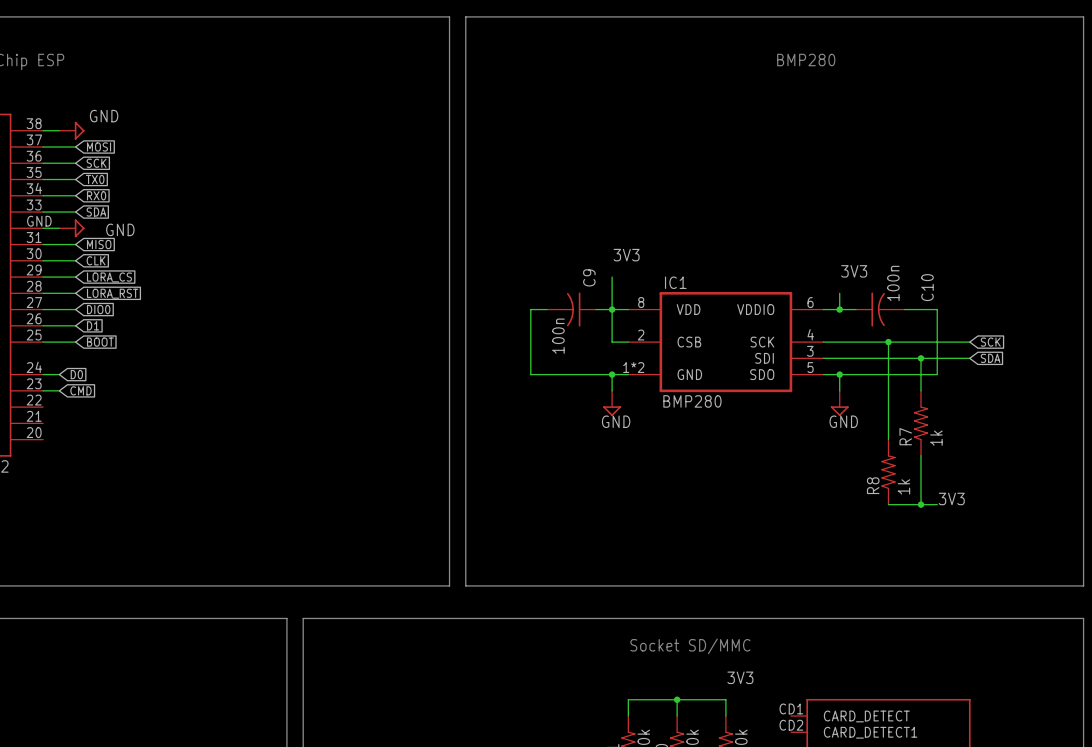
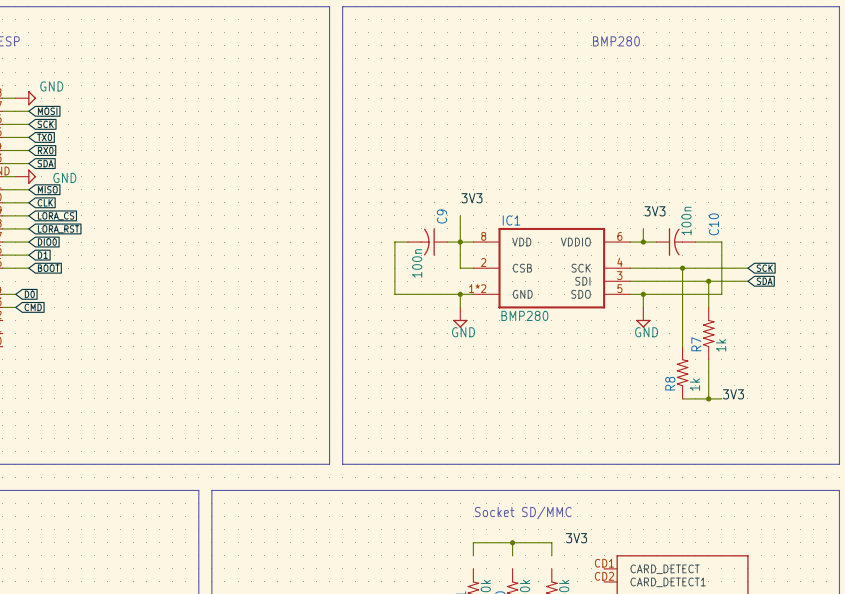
label position: 3V3 (740, 677) -> 3V3 (576, 538)
wire: (677, 699) (677, 716) -> (512, 555) (512, 542)
junction position: (677, 699) -> (512, 542)
wire: (628, 716) (628, 699) (725, 699) (725, 716) -> (473, 555) (473, 542) (551, 542) (551, 555)

